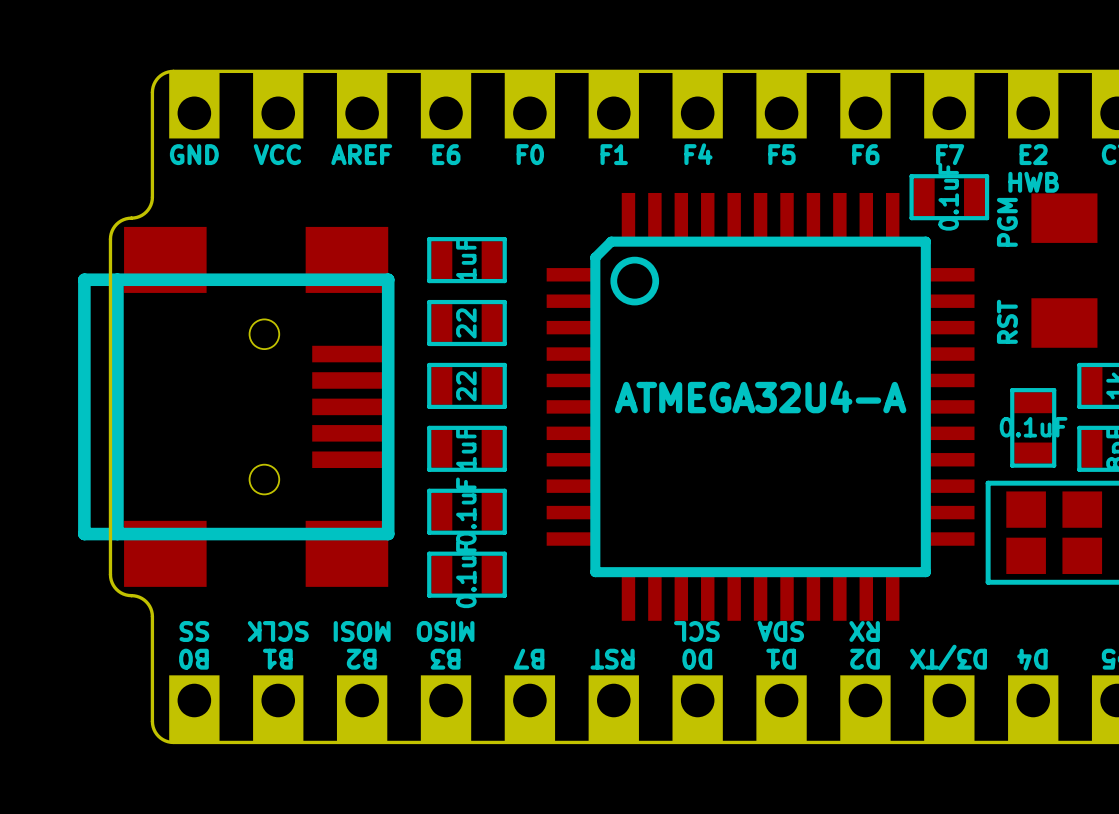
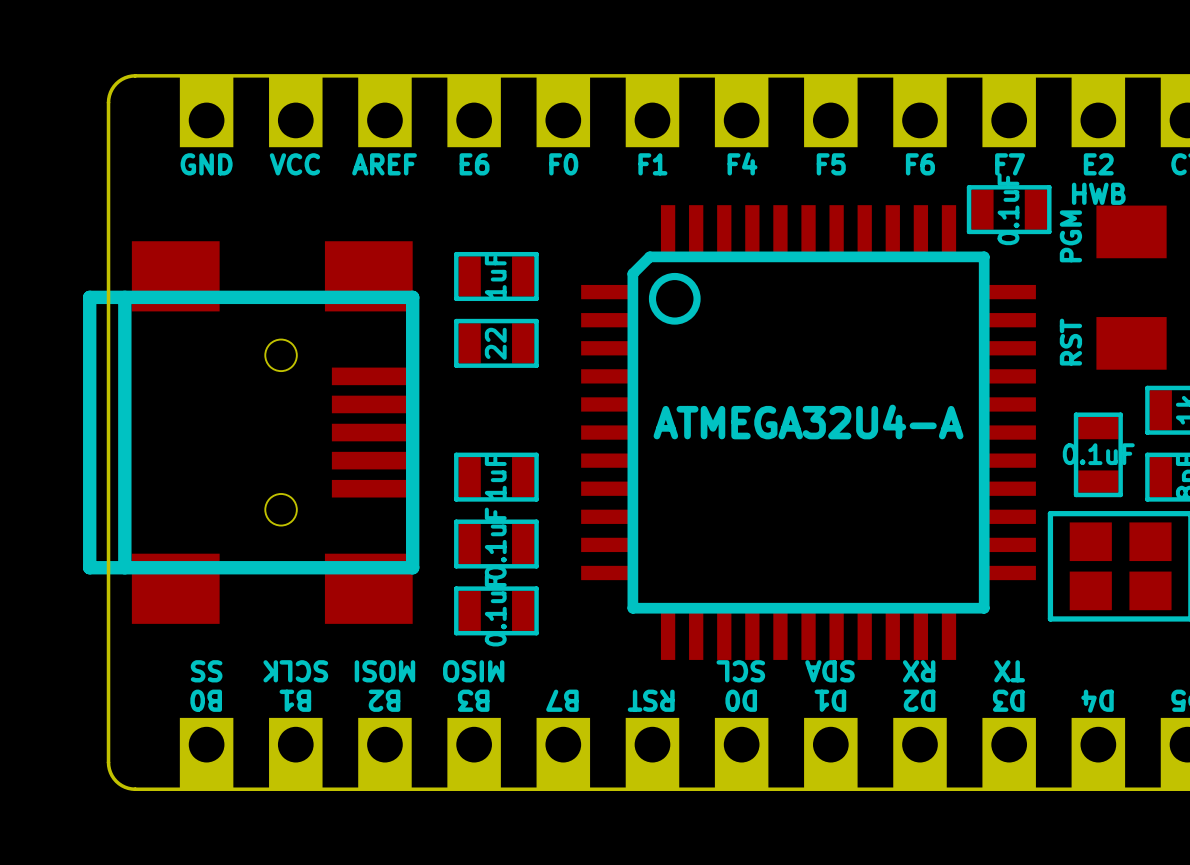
board edge: (173, 71) (165, 72) (158, 77) (152, 89) (151, 202) (144, 213) (131, 218) -> none
board edge: (131, 218) (123, 219) (116, 224) (112, 231) (110, 239) (110, 577) (113, 585) (118, 591) (141, 598) (150, 608) (152, 724) (155, 731) (160, 738) (173, 742) -> (184, 75) (135, 75) (125, 77) (112, 89) (108, 102) (108, 765) (116, 781) (128, 788) (184, 789)
part: 22 (466, 385) -> none
text: none -> TX (1009, 671)
text: D3/TX (948, 657) -> D3 (1008, 700)

